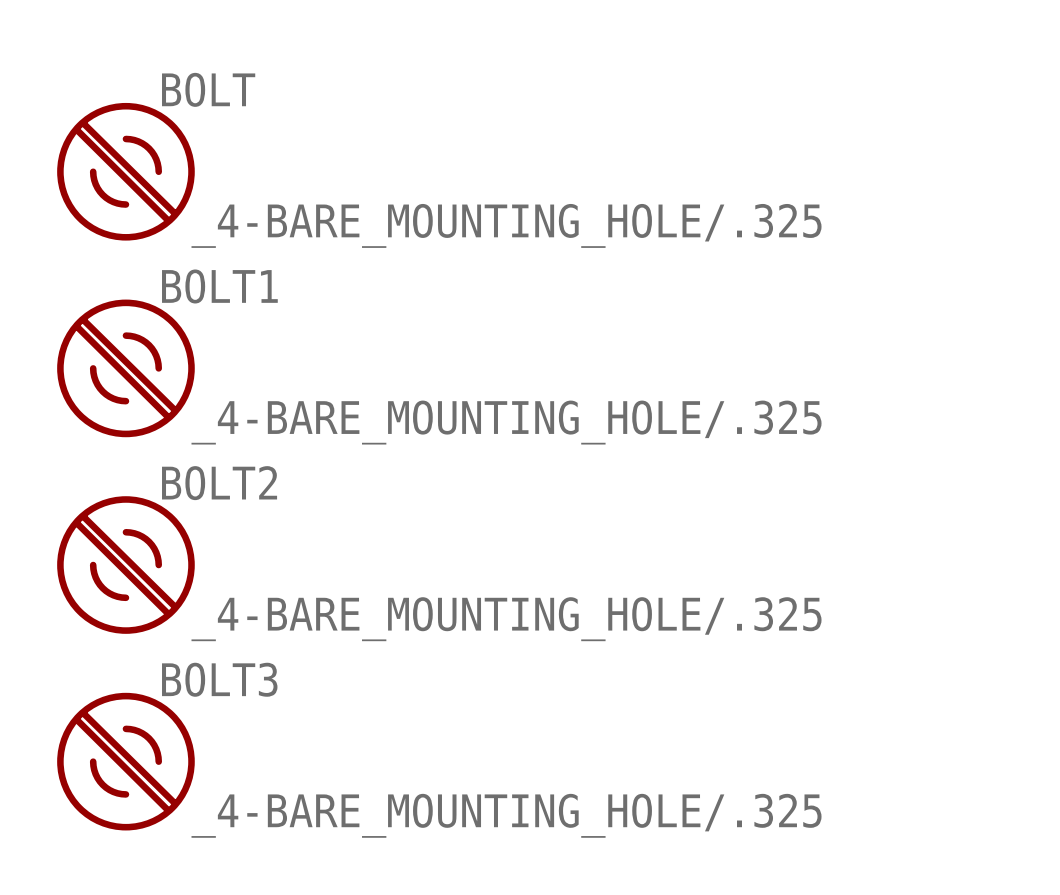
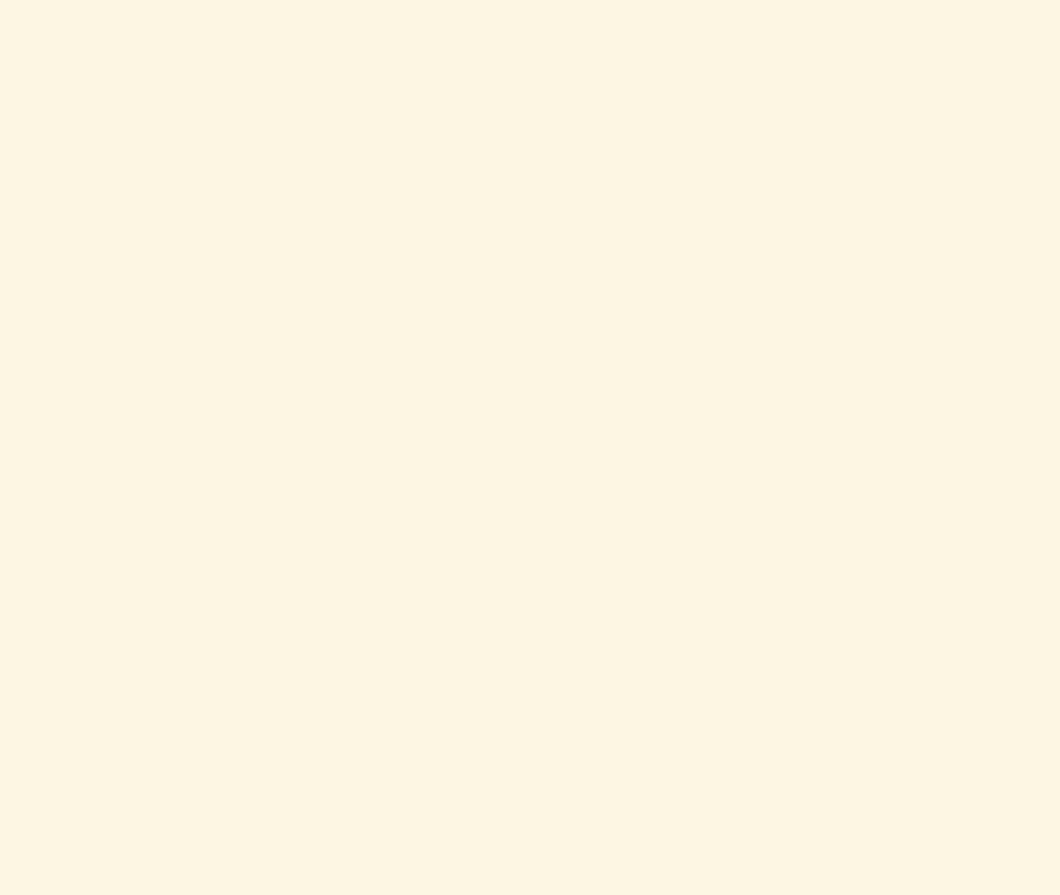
BOLT: _4-BARE_MOUNTING_HOLE/.325 (125, 171) -> none
BOLT1: _4-BARE_MOUNTING_HOLE/.325 (125, 368) -> none
BOLT2: _4-BARE_MOUNTING_HOLE/.325 (125, 565) -> none
BOLT3: _4-BARE_MOUNTING_HOLE/.325 (125, 761) -> none

